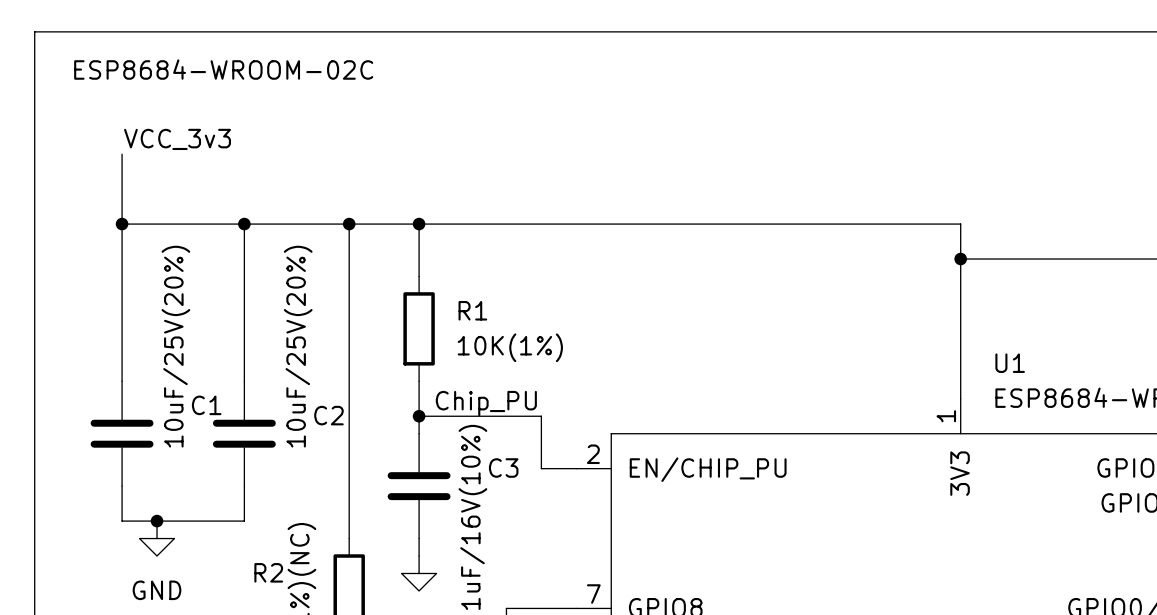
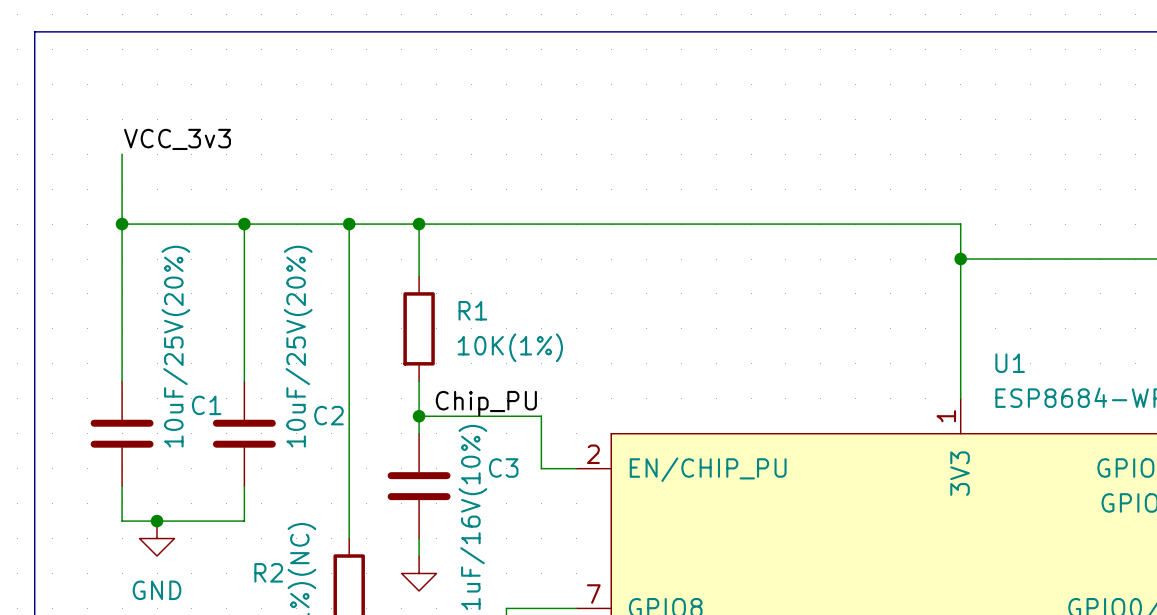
text: ESP8684-WROOM-02C (223, 69) -> none

